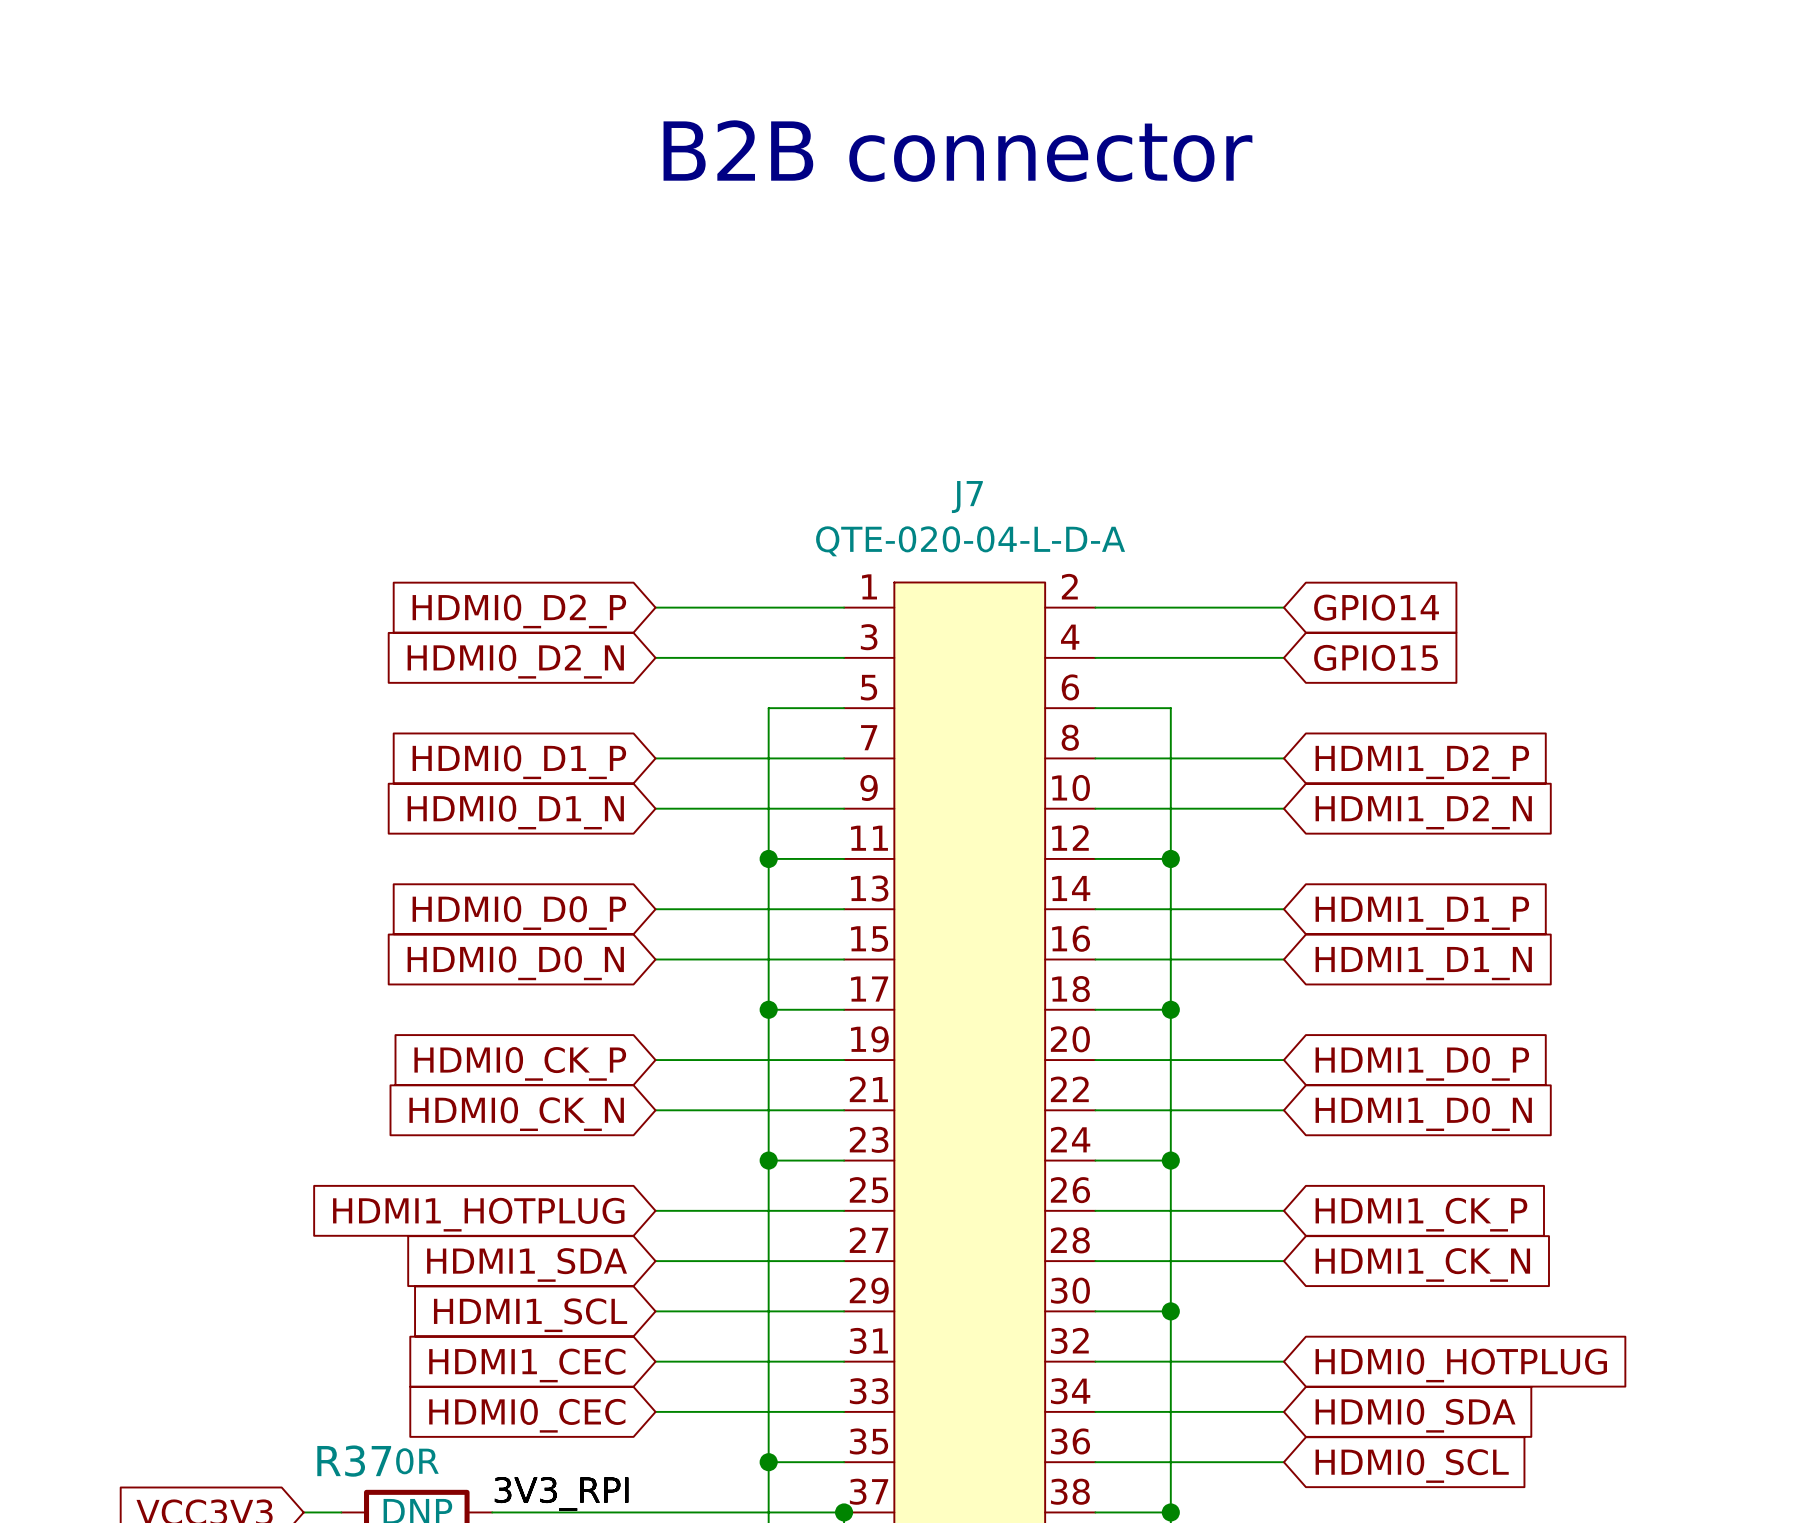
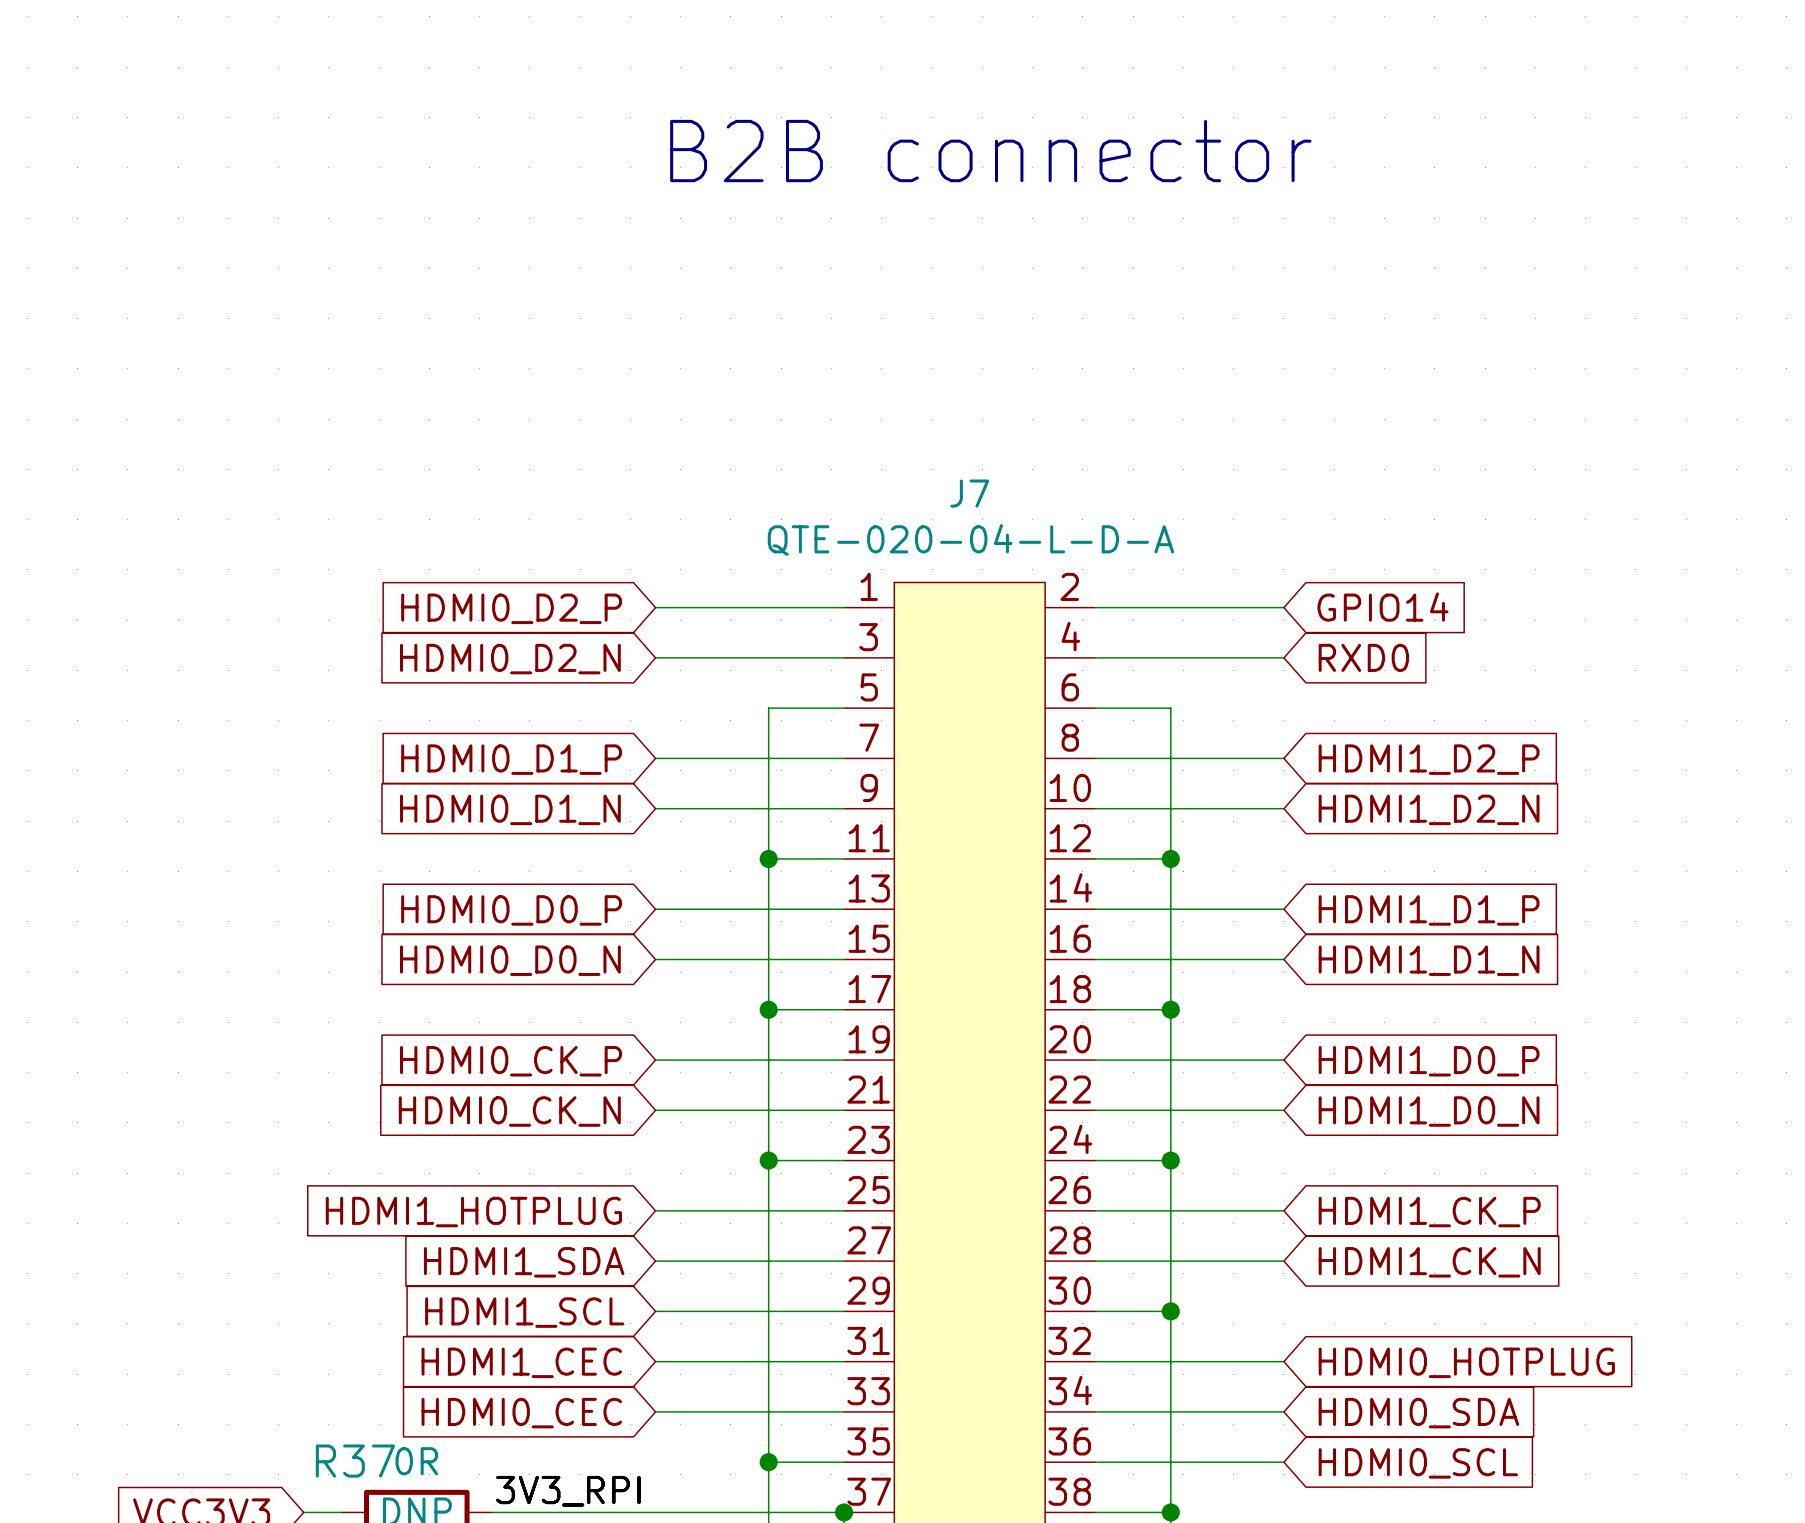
global label: GPIO15 (1376, 657) -> RXD0 (1363, 657)

